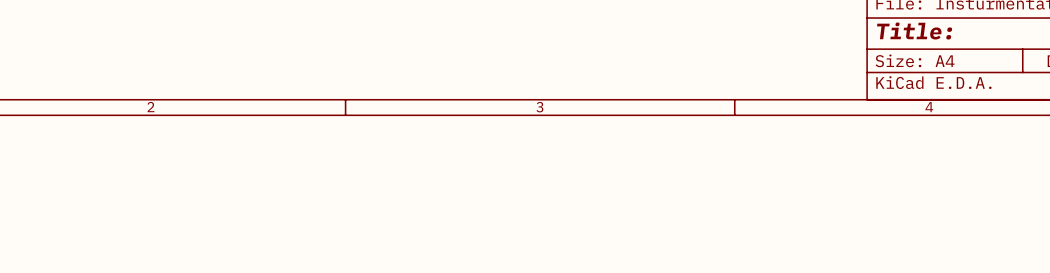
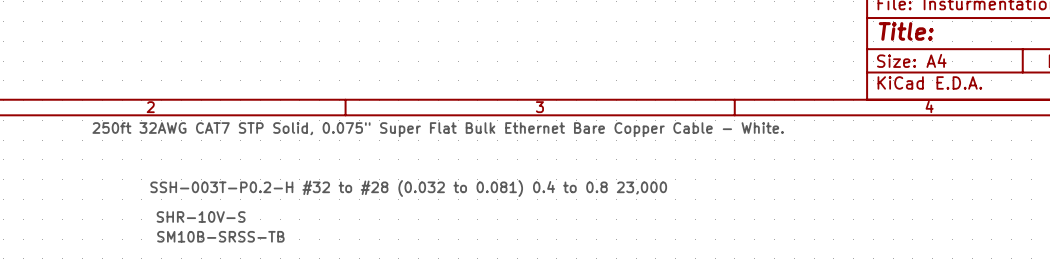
text: none -> 250ft 32AWG CAT7 STP Solid, 0.075" Super Flat Bulk Ethernet Bare Copper Cable - White. (438, 129)
text: none -> SSH-003T-P0.2-H #32 to #28 (0.032 to 0.081) 0.4 to 0.8 23,000 (408, 188)
text: none -> SHR-10V-S (201, 216)
text: none -> SM10B-SRSS-TB (220, 236)

